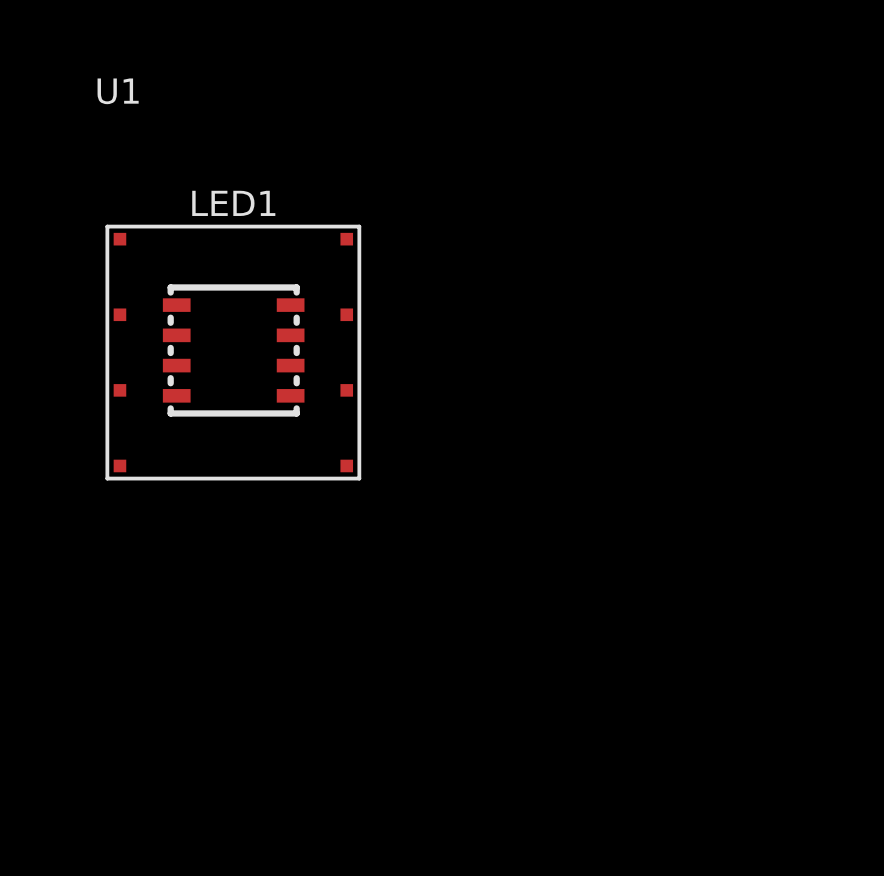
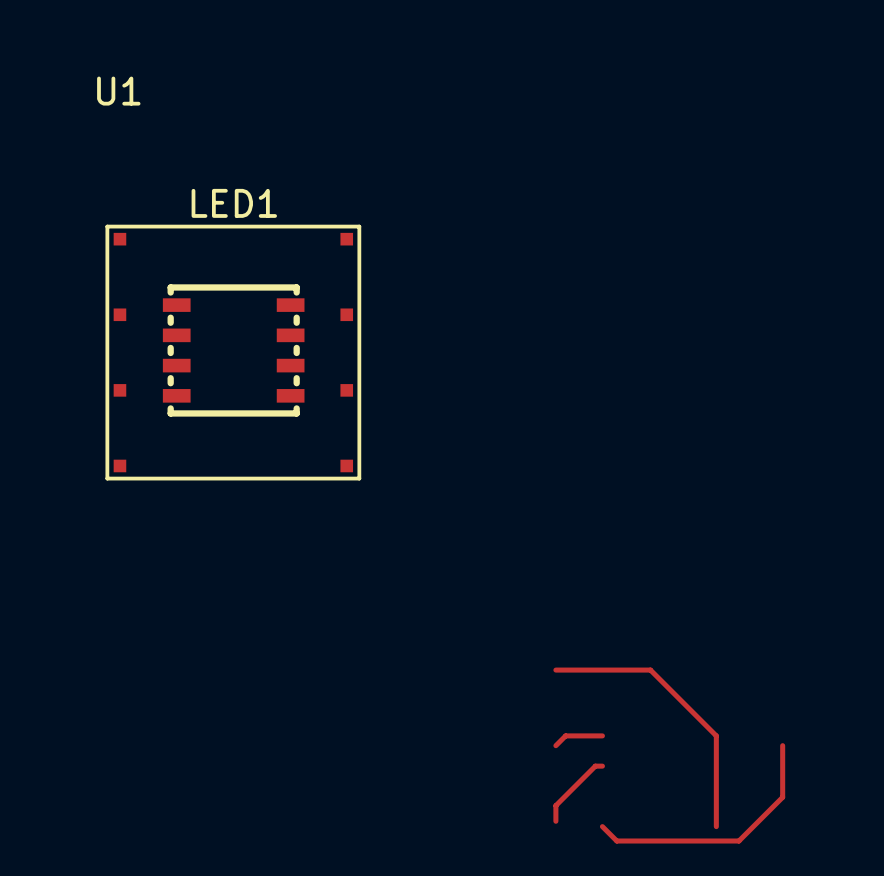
track: none -> (555, 670) (650, 670) (716, 735) (716, 826)
track: none -> (602, 735) (565, 735) (555, 745)
track: none -> (782, 745) (782, 797) (738, 841) (616, 841) (602, 826)
track: none -> (602, 766) (595, 766) (555, 805) (555, 821)

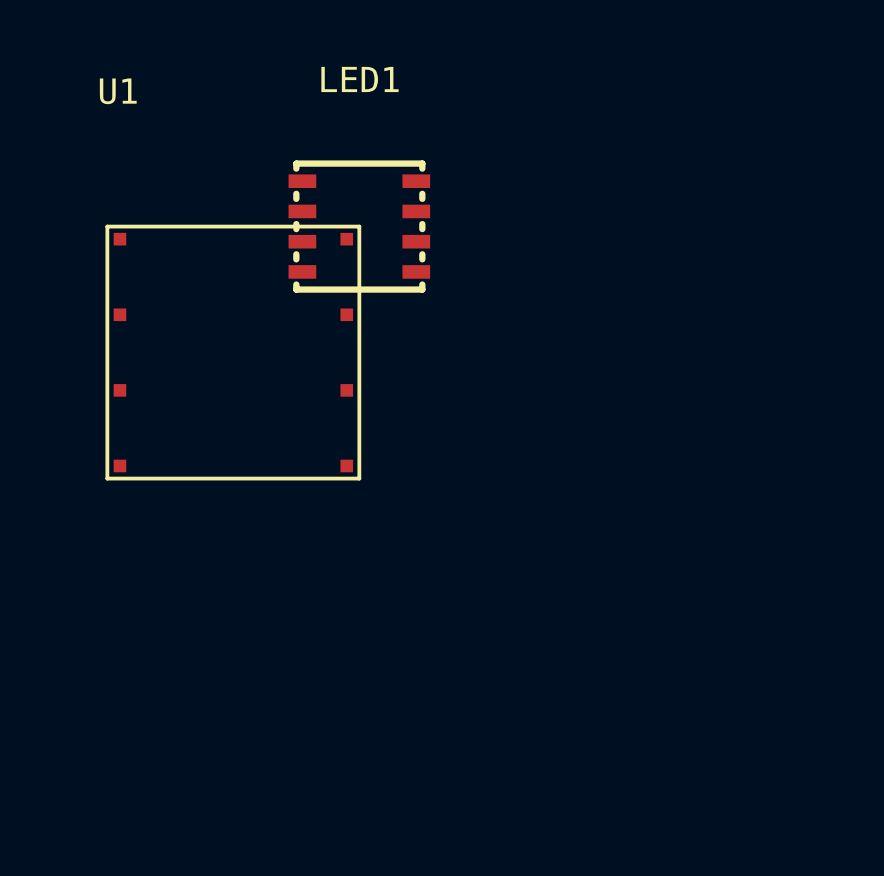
LED1 position: (233, 350) -> (359, 226)
track: (555, 670) (650, 670) (716, 735) (716, 826) -> none
track: (602, 735) (565, 735) (555, 745) -> none
track: (782, 745) (782, 797) (738, 841) (616, 841) (602, 826) -> none
track: (602, 766) (595, 766) (555, 805) (555, 821) -> none

